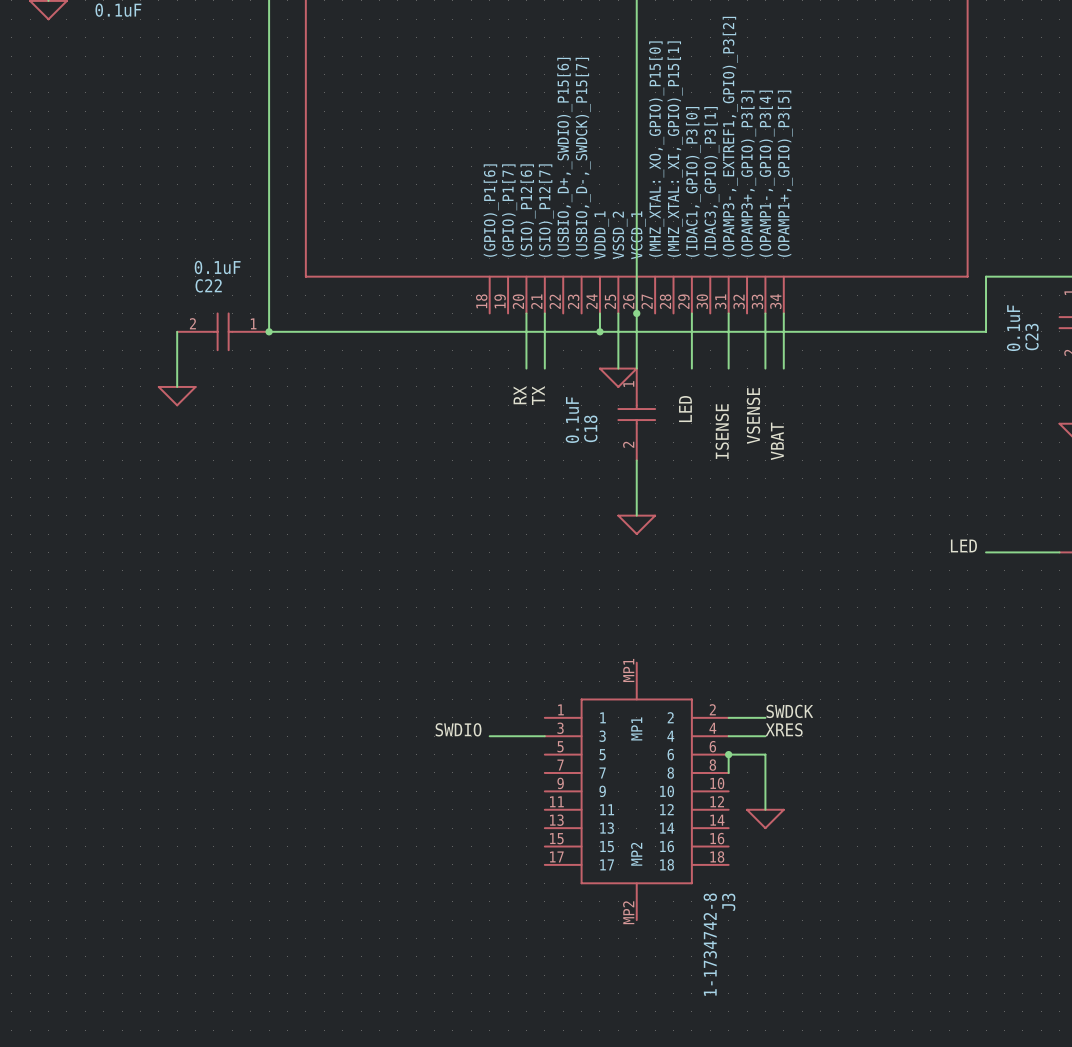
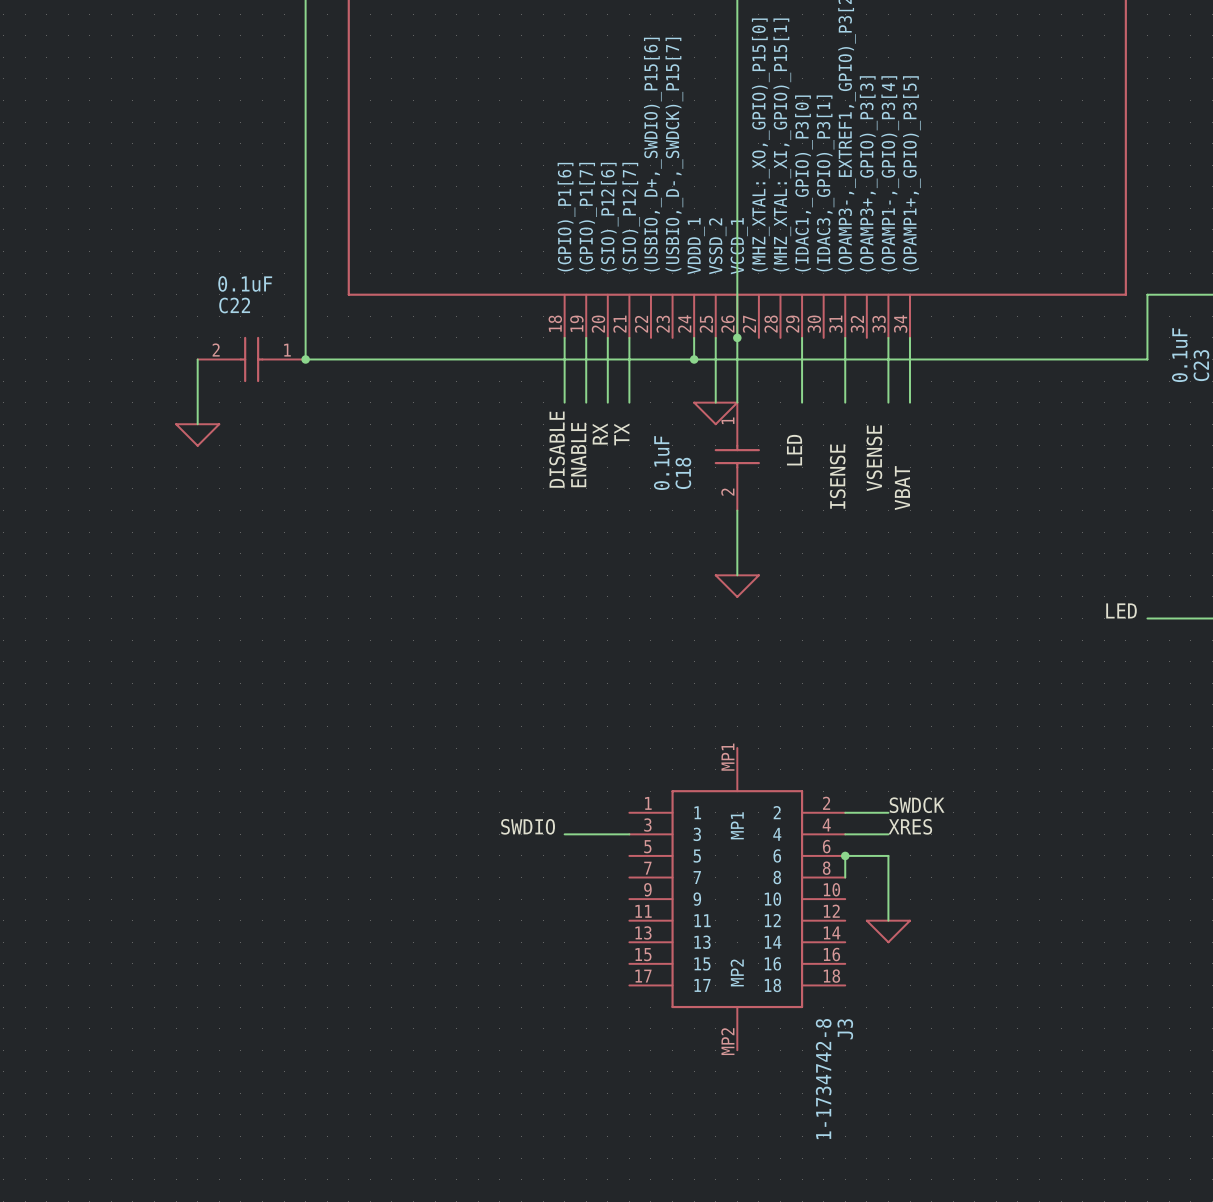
wire: none -> (564, 337) (564, 402)
wire: none -> (586, 337) (586, 402)
label: none -> DISABLE (557, 449)
label: none -> ENABLE (578, 454)

